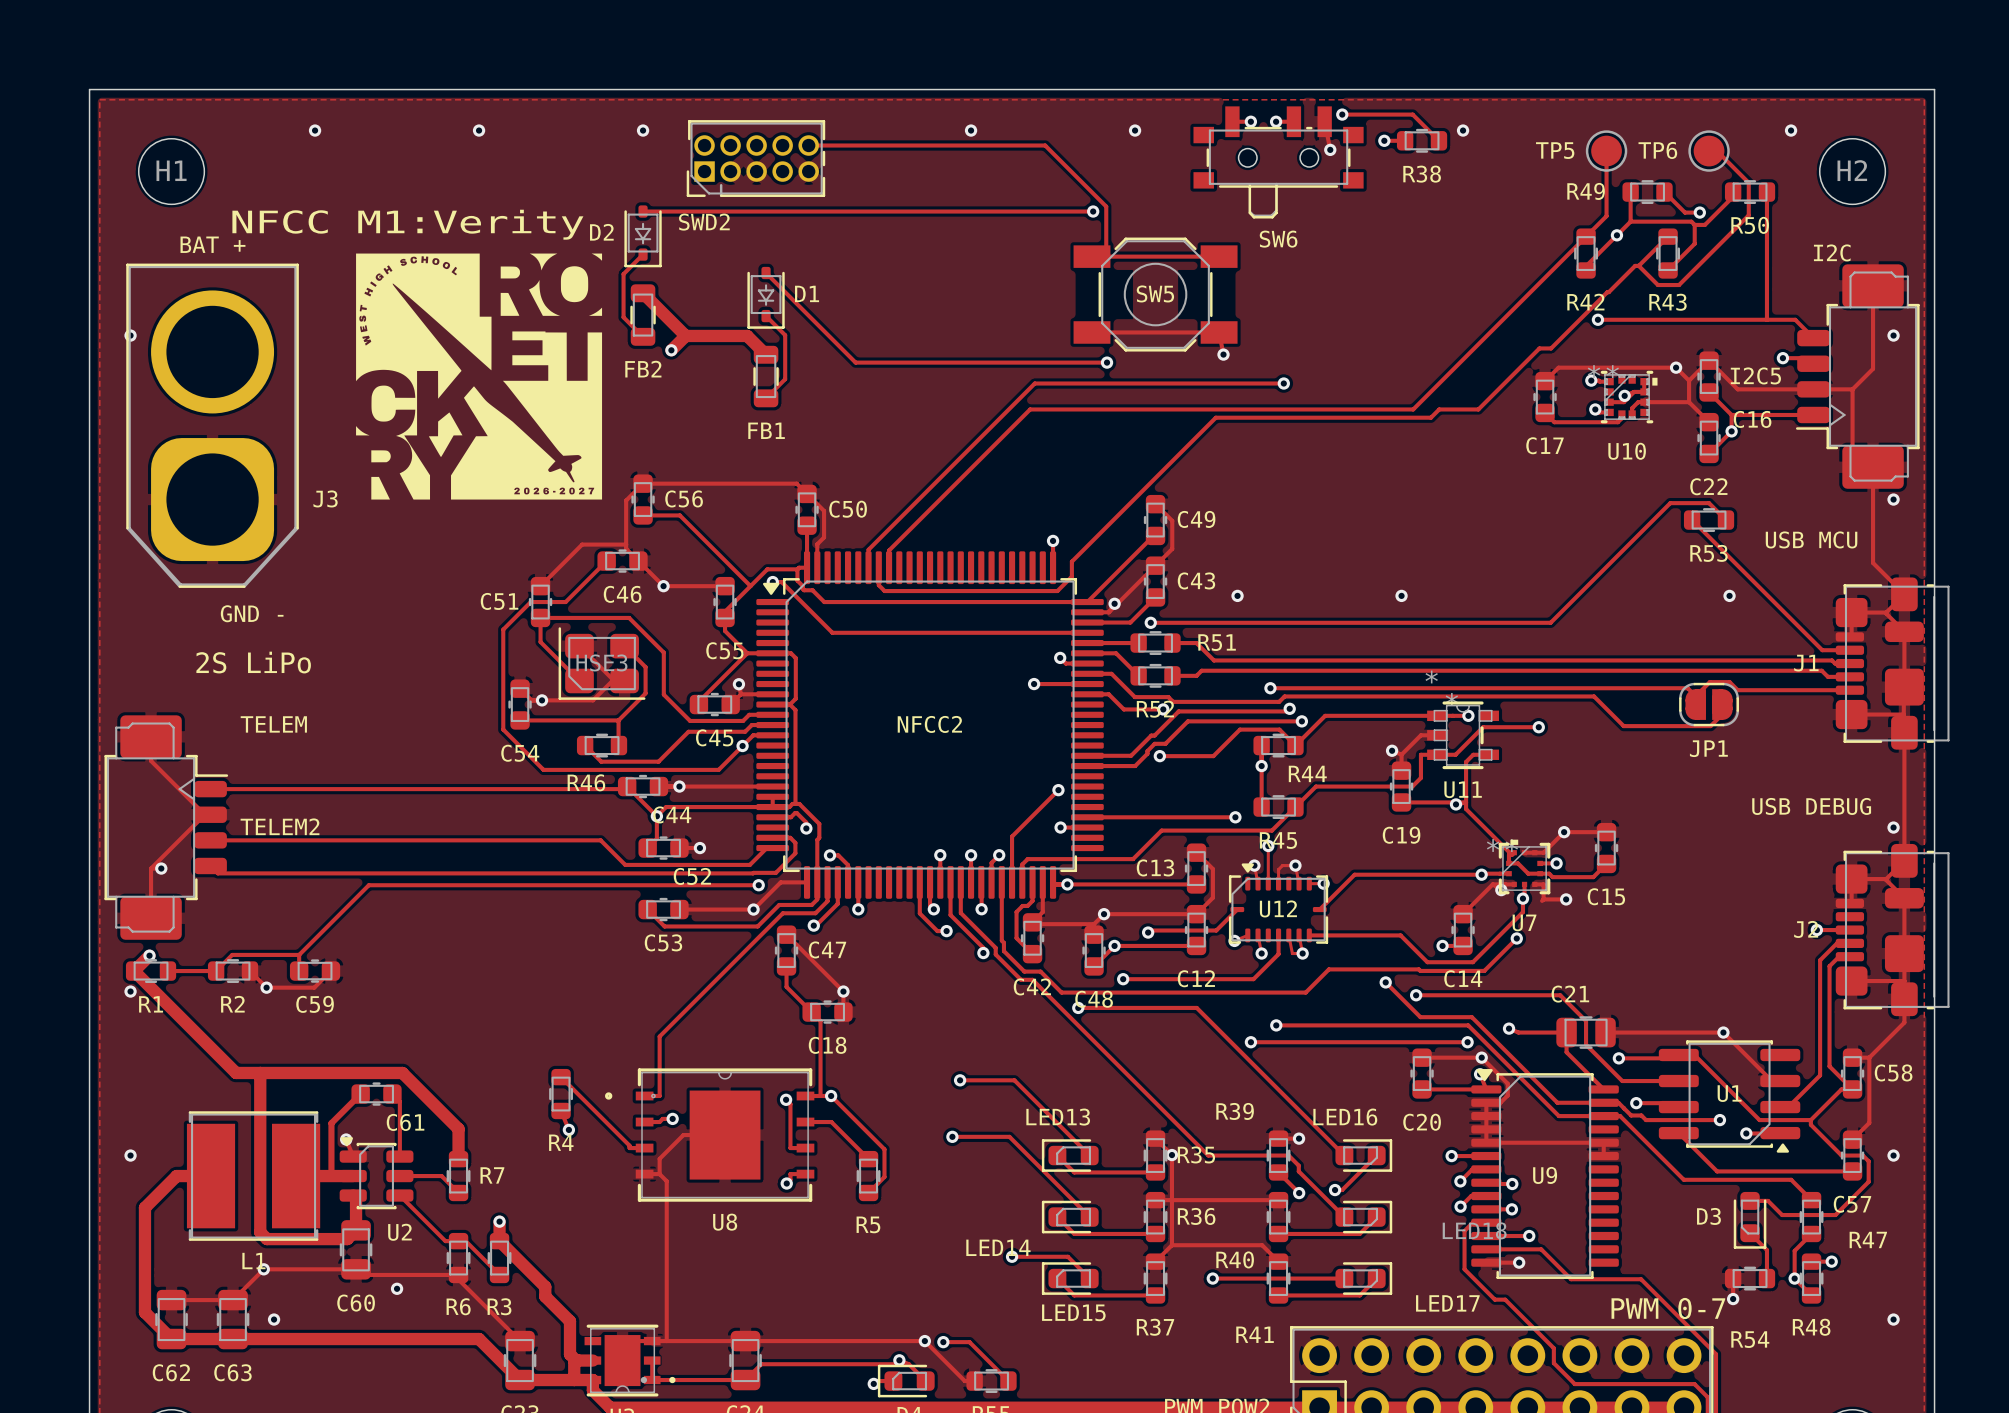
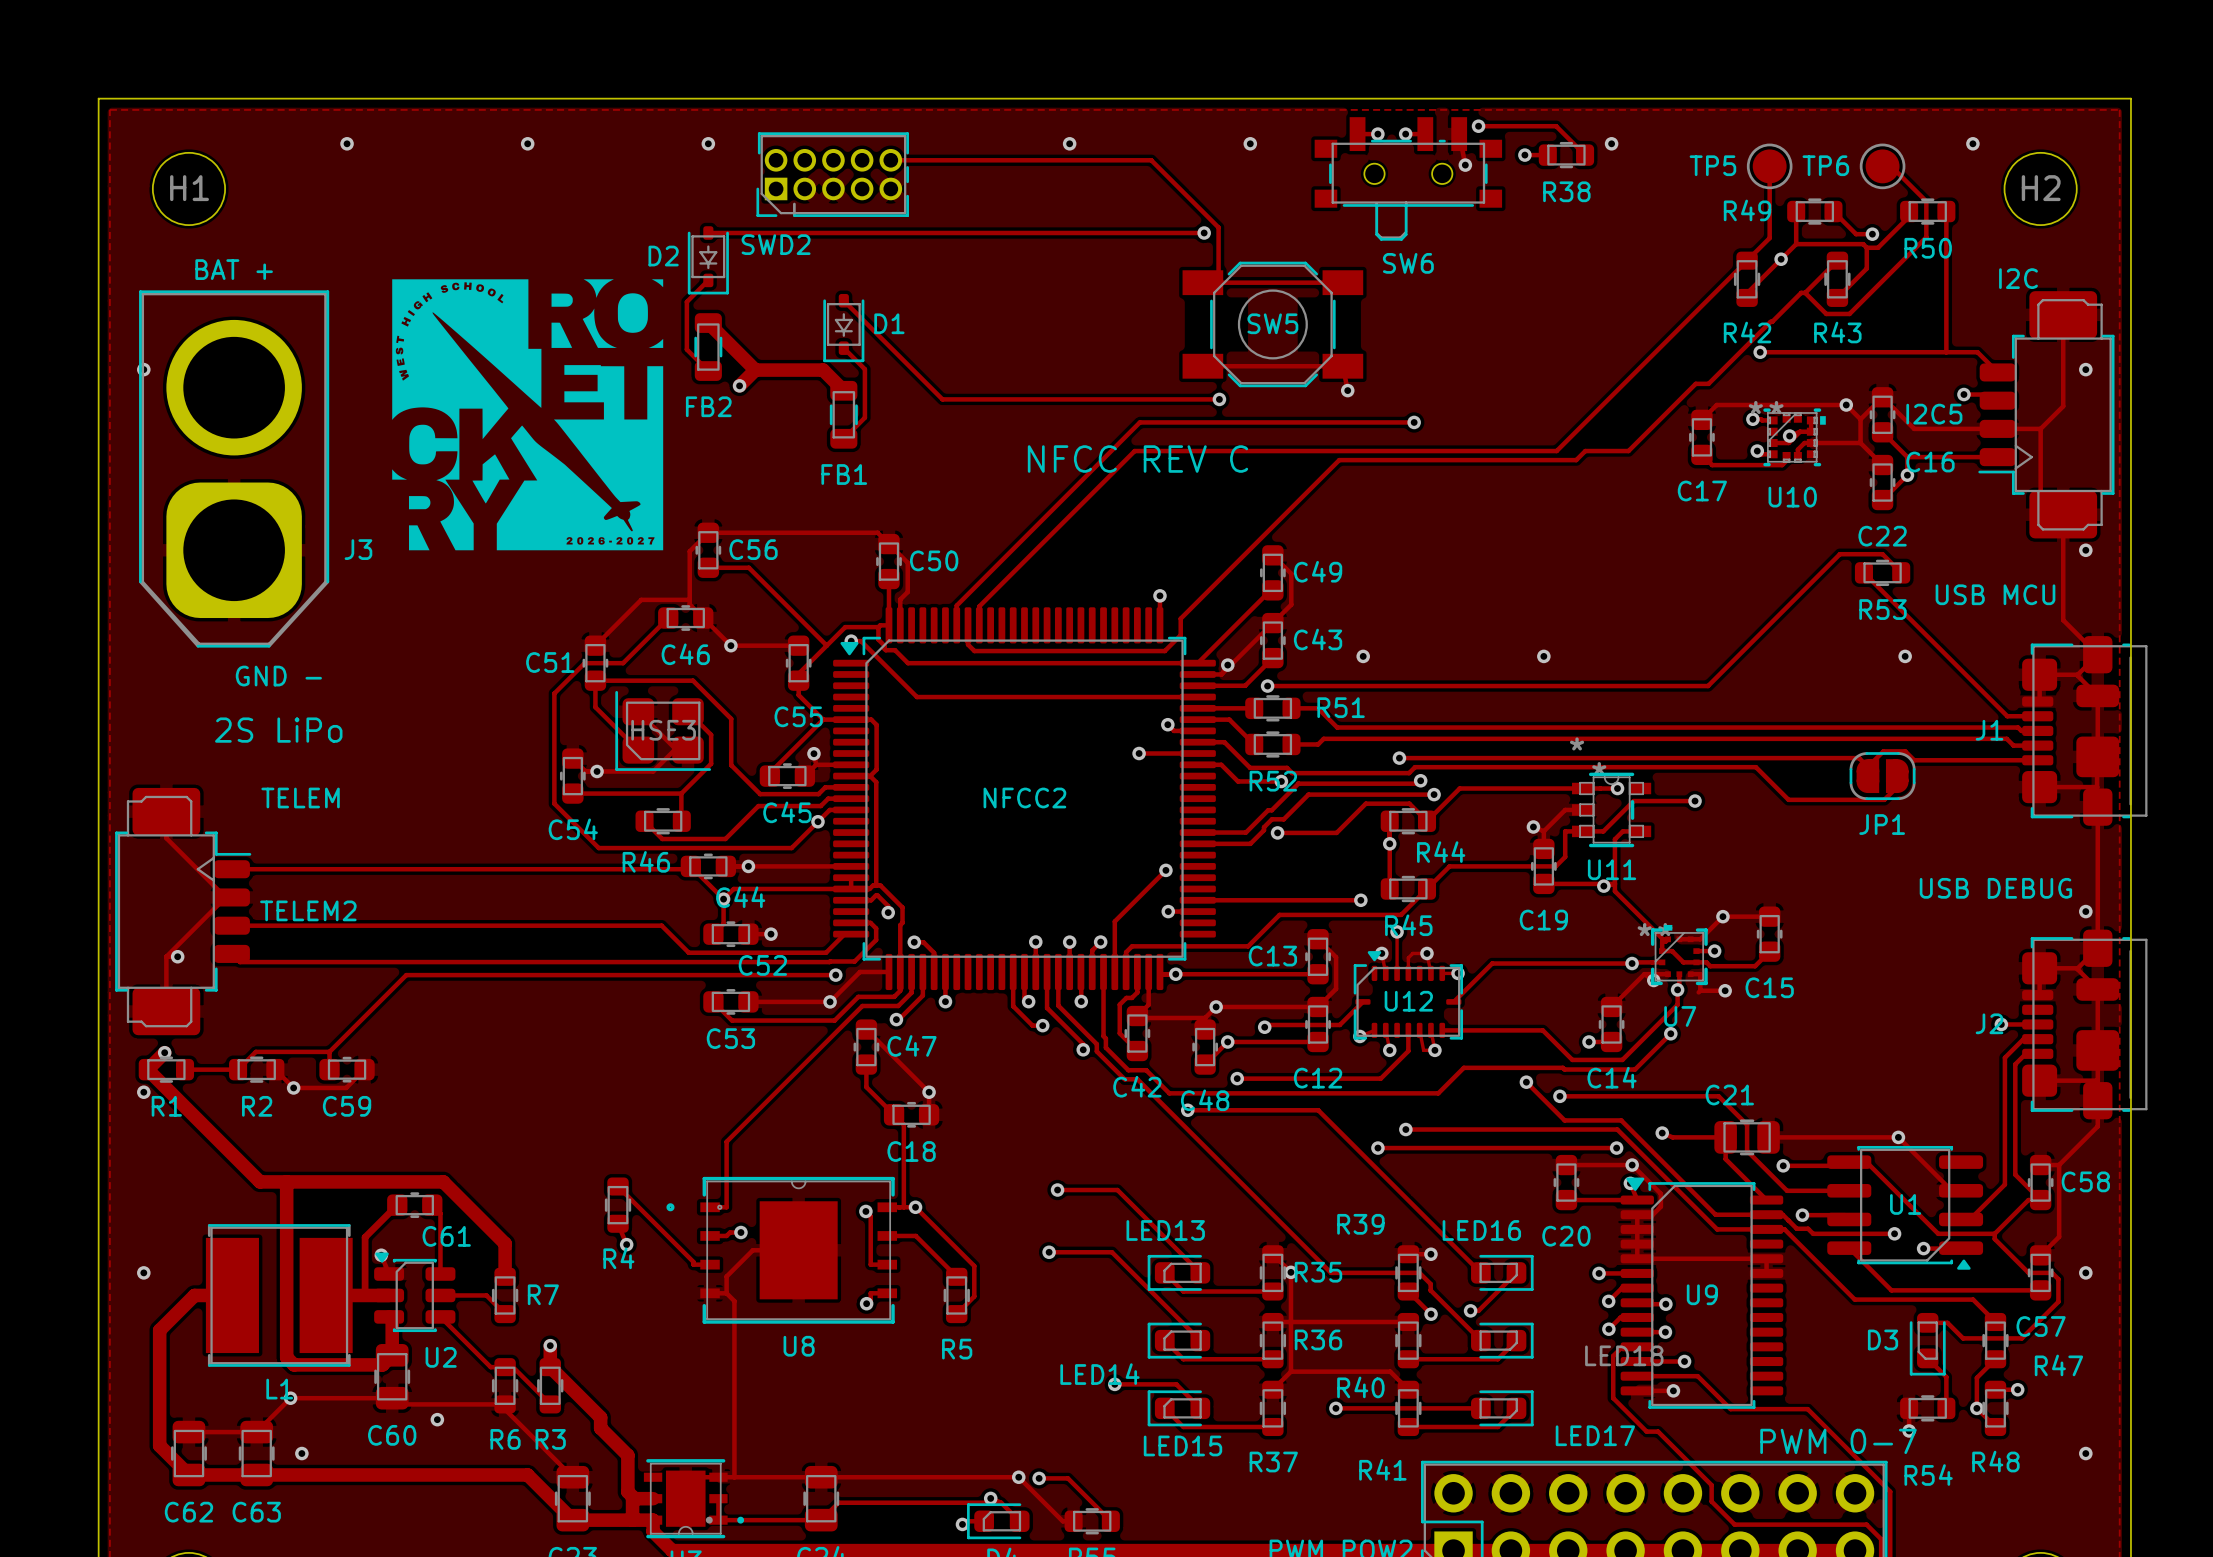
text: NFCC M1:Verity (407, 224) -> none
text: none -> NFCC REV C (1137, 459)

